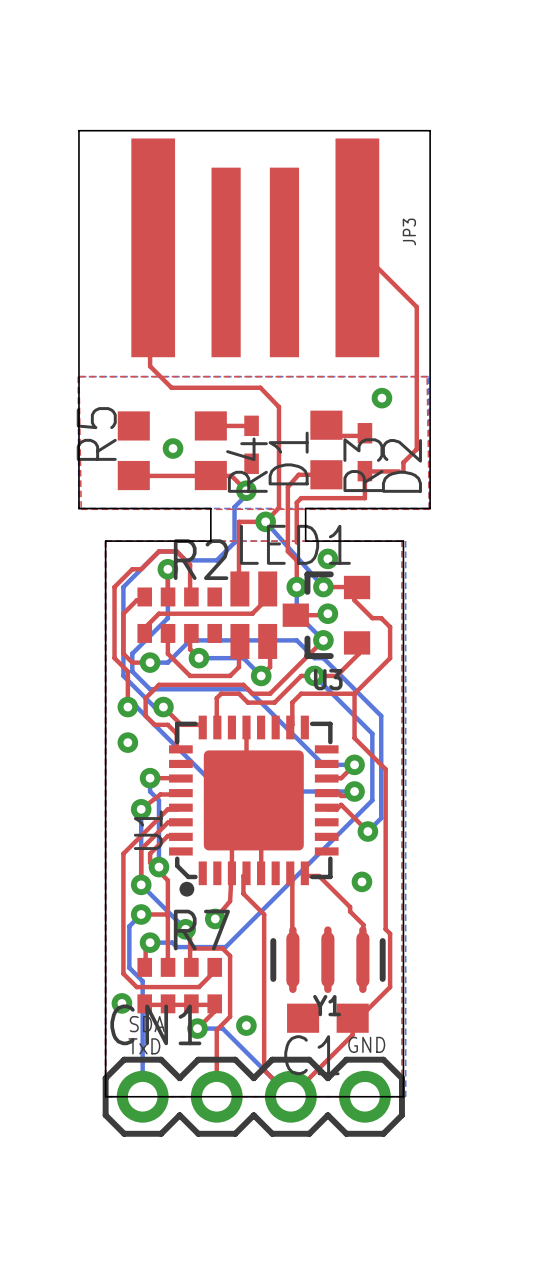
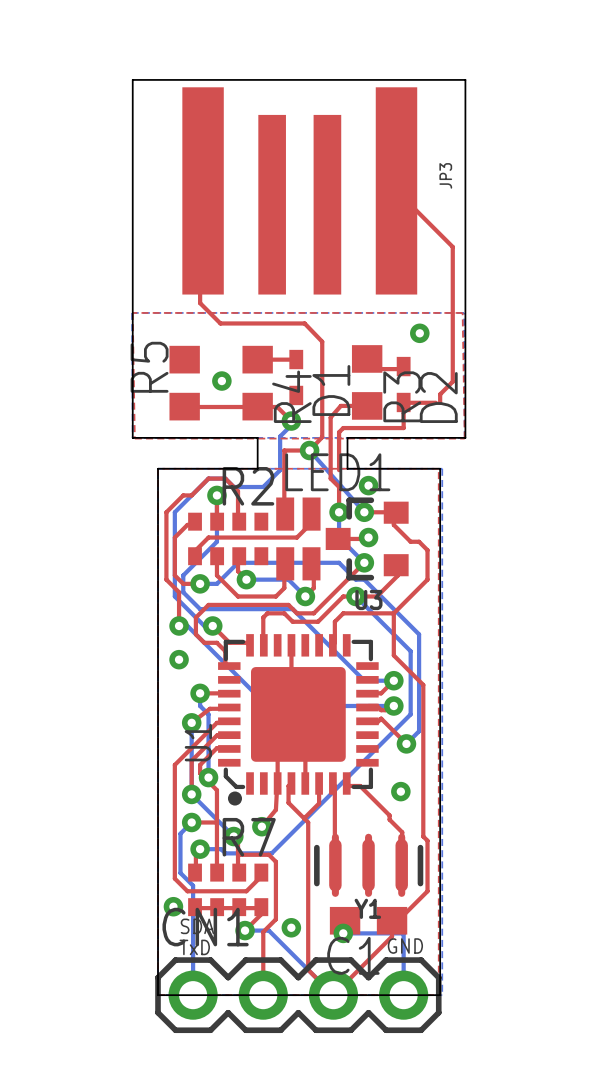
top track: none -> (319, 783) (319, 803) (304, 818)
bottom track: none -> (343, 933) (403, 933) (403, 995)
via: none -> (343, 933)

